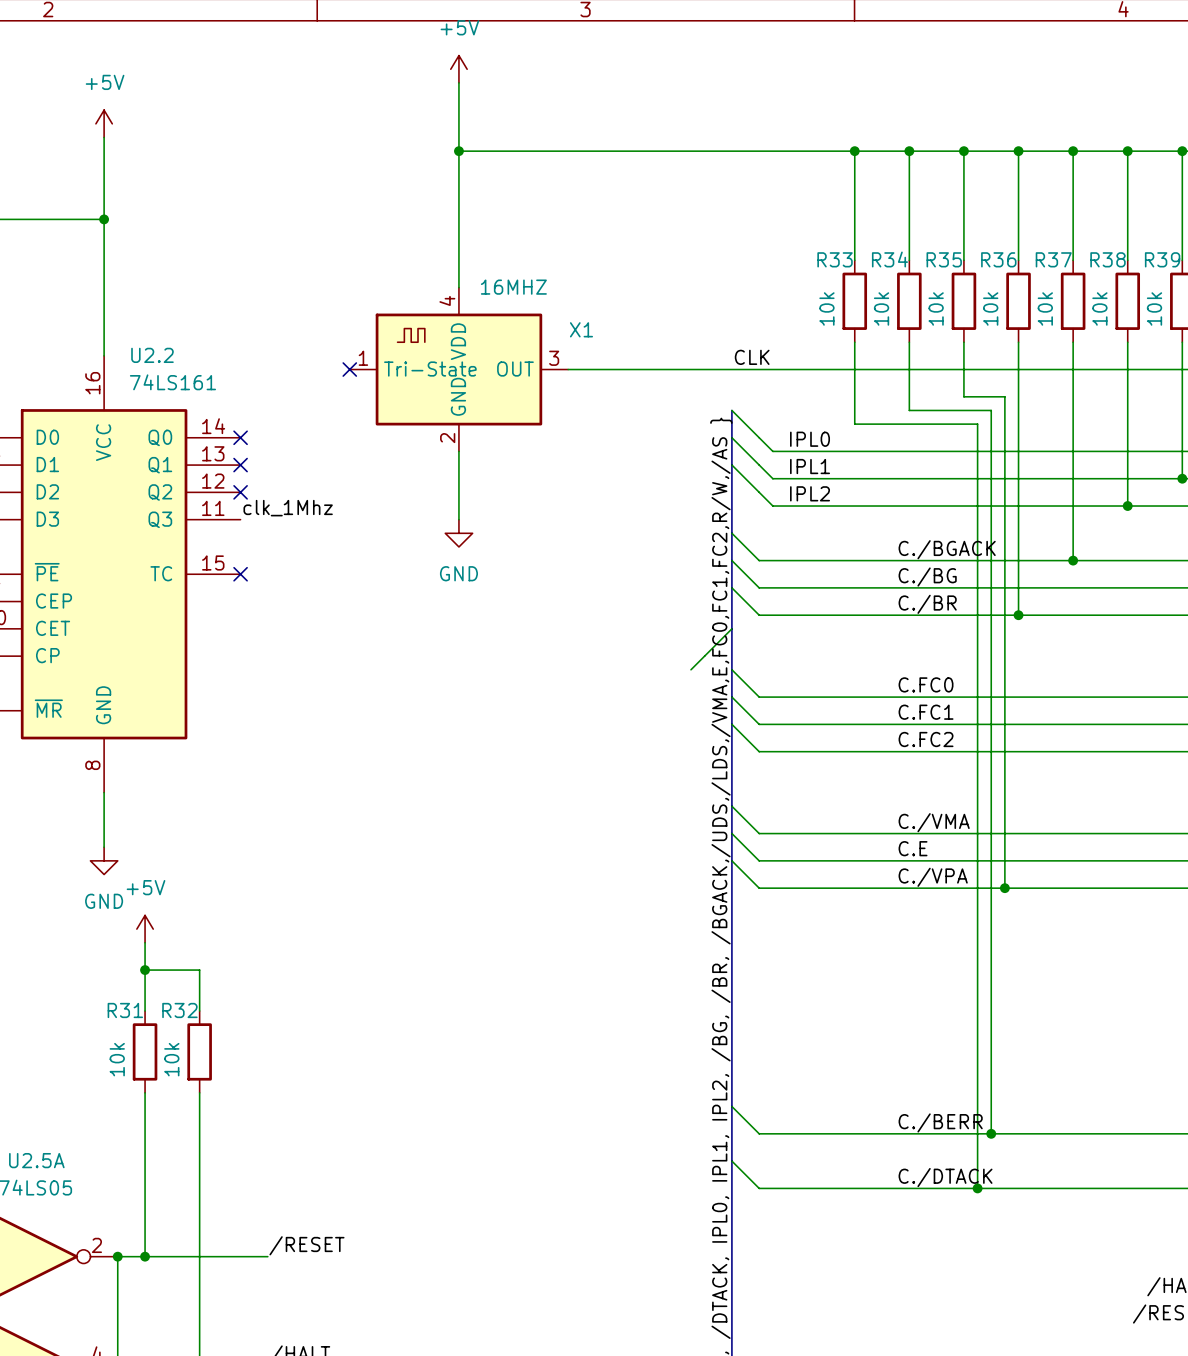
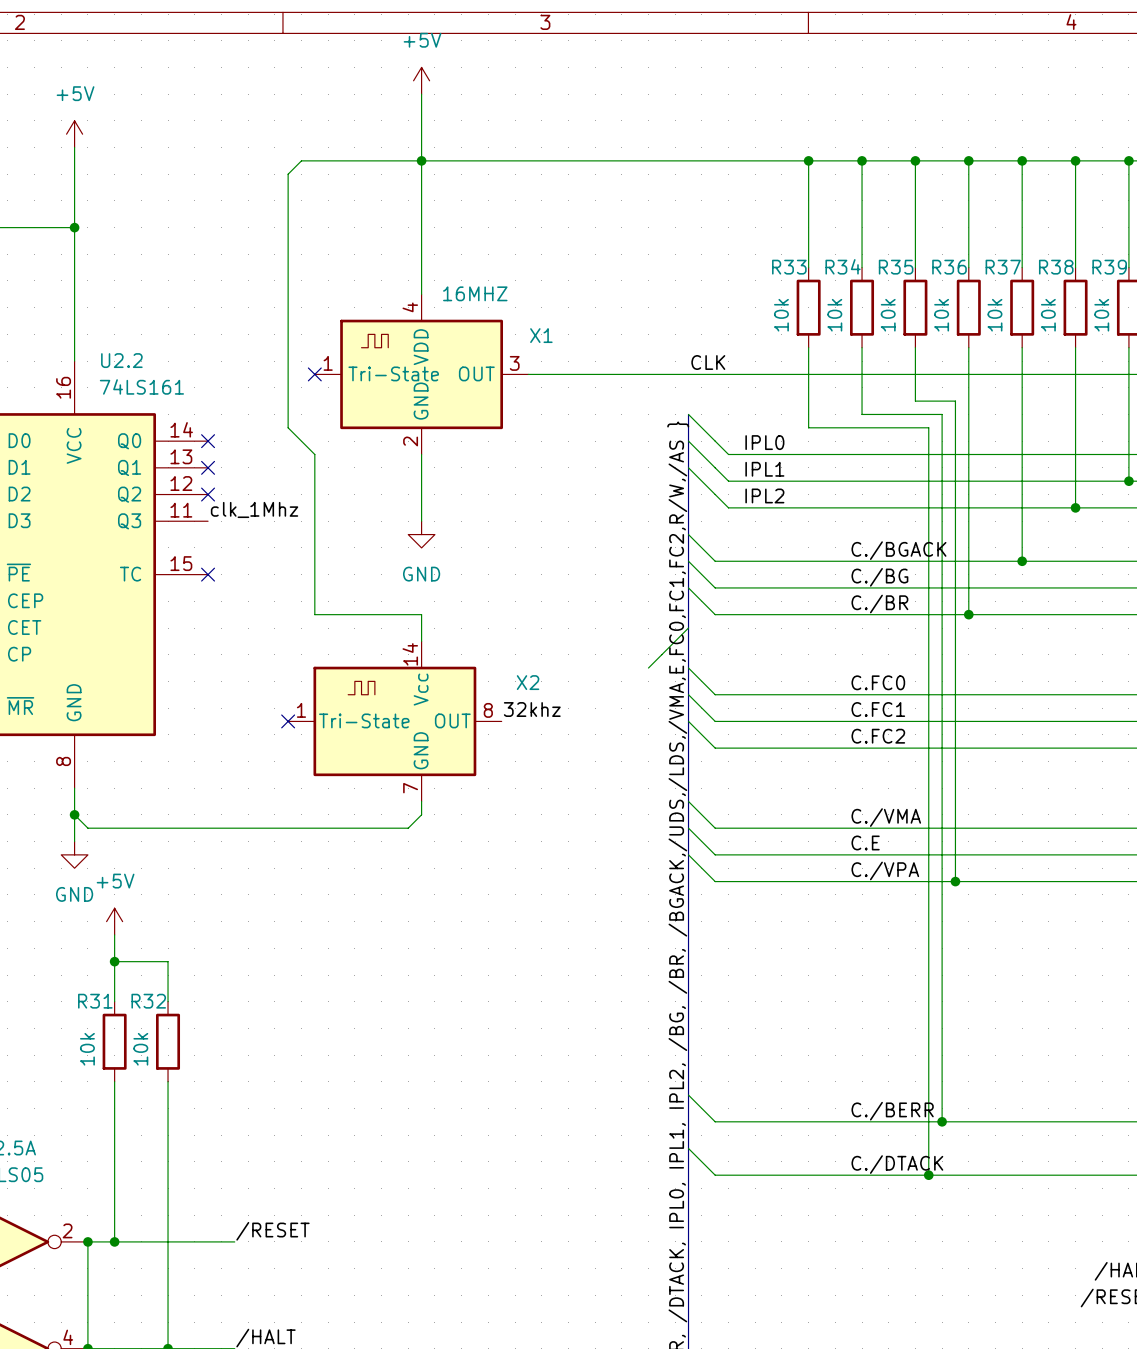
wire: none -> (421, 160) (301, 160) (288, 174) (288, 427) (314, 454) (314, 614) (421, 614) (421, 641)
label: none -> 32khz (532, 709)
no-connect mark: none -> (288, 721)
X2: none -> (394, 721)
wire: none -> (421, 801) (421, 814) (408, 828) (87, 828) (74, 814)
junction: none -> (74, 814)

